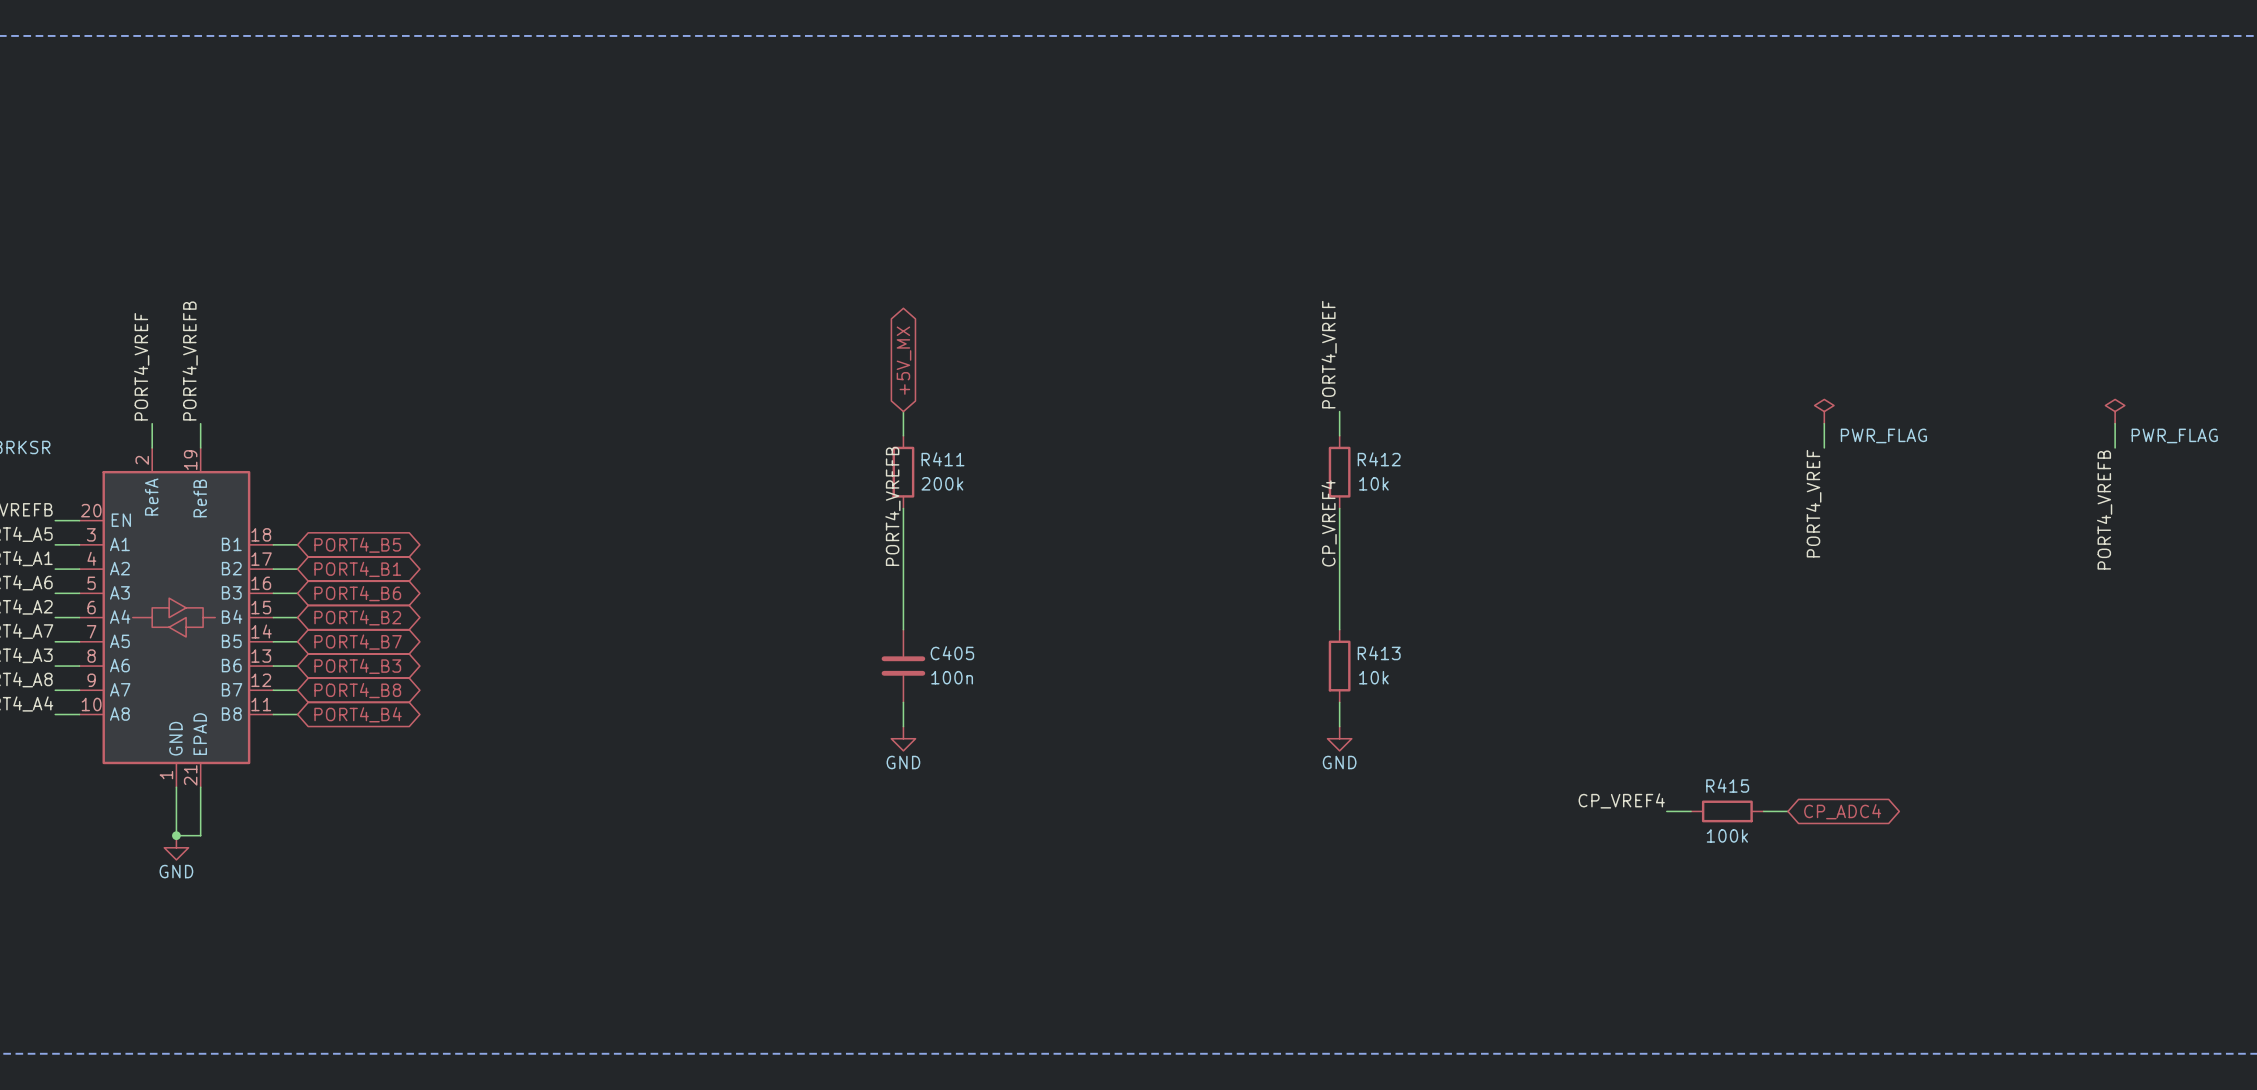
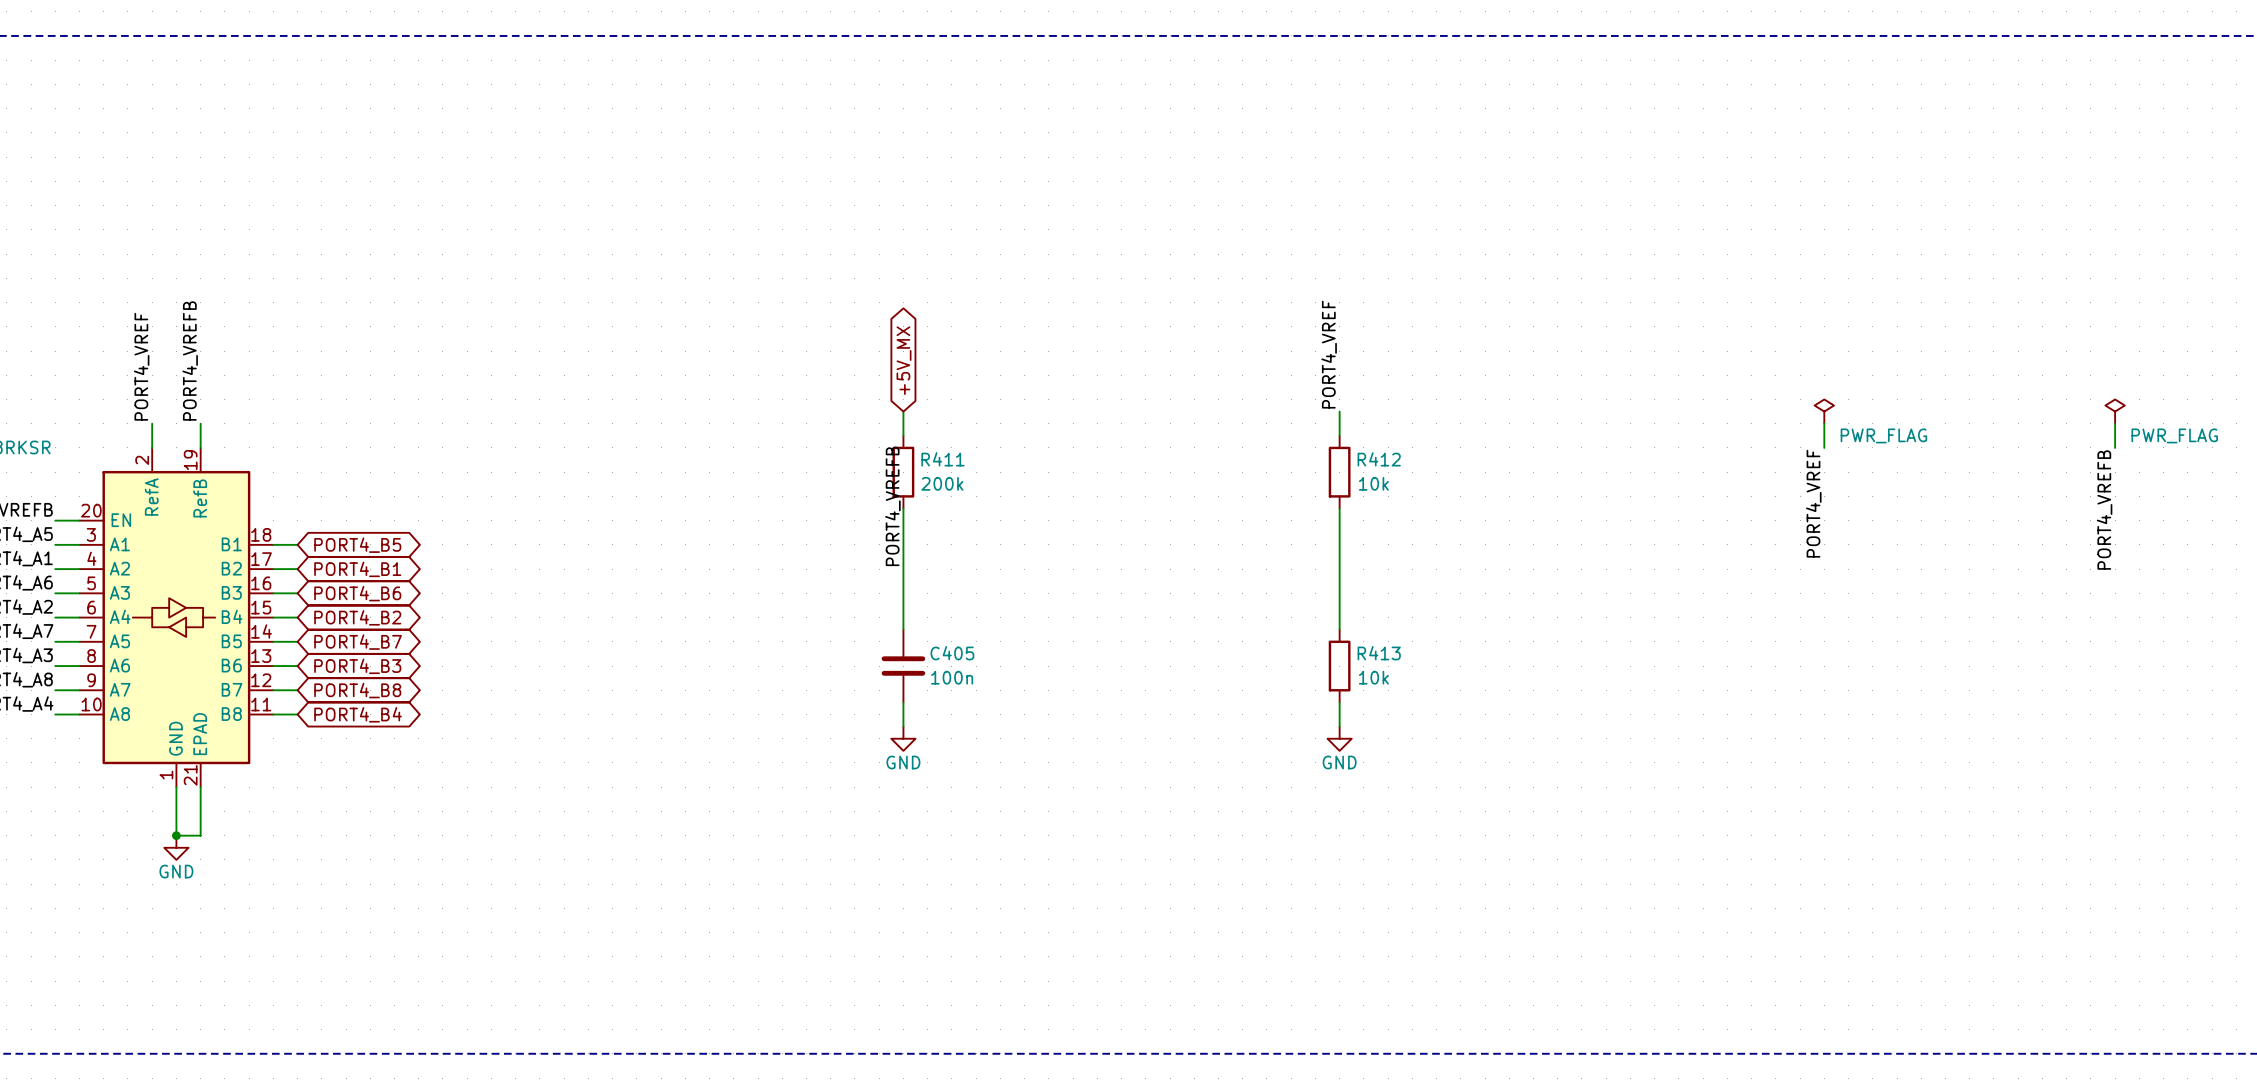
label: CP_VREF4 (1329, 523) -> none
label: CP_VREF4 (1621, 800) -> none
wire: (1666, 811) (1691, 811) -> none
R415: 100k (1727, 811) -> none
wire: (1763, 811) (1787, 811) -> none
global label: CP_ADC4 (1842, 811) -> none

